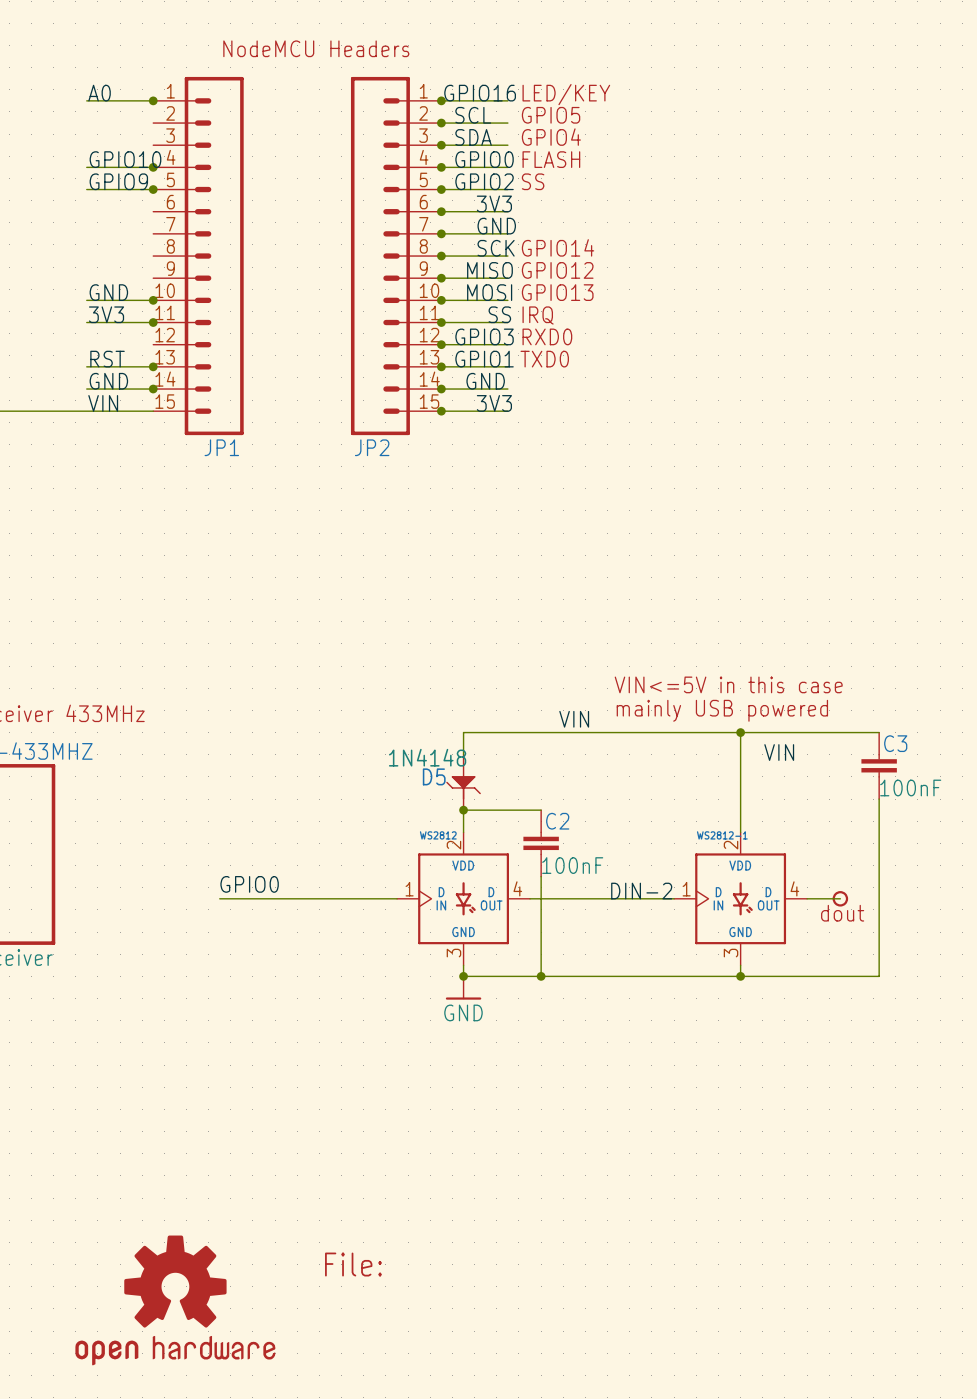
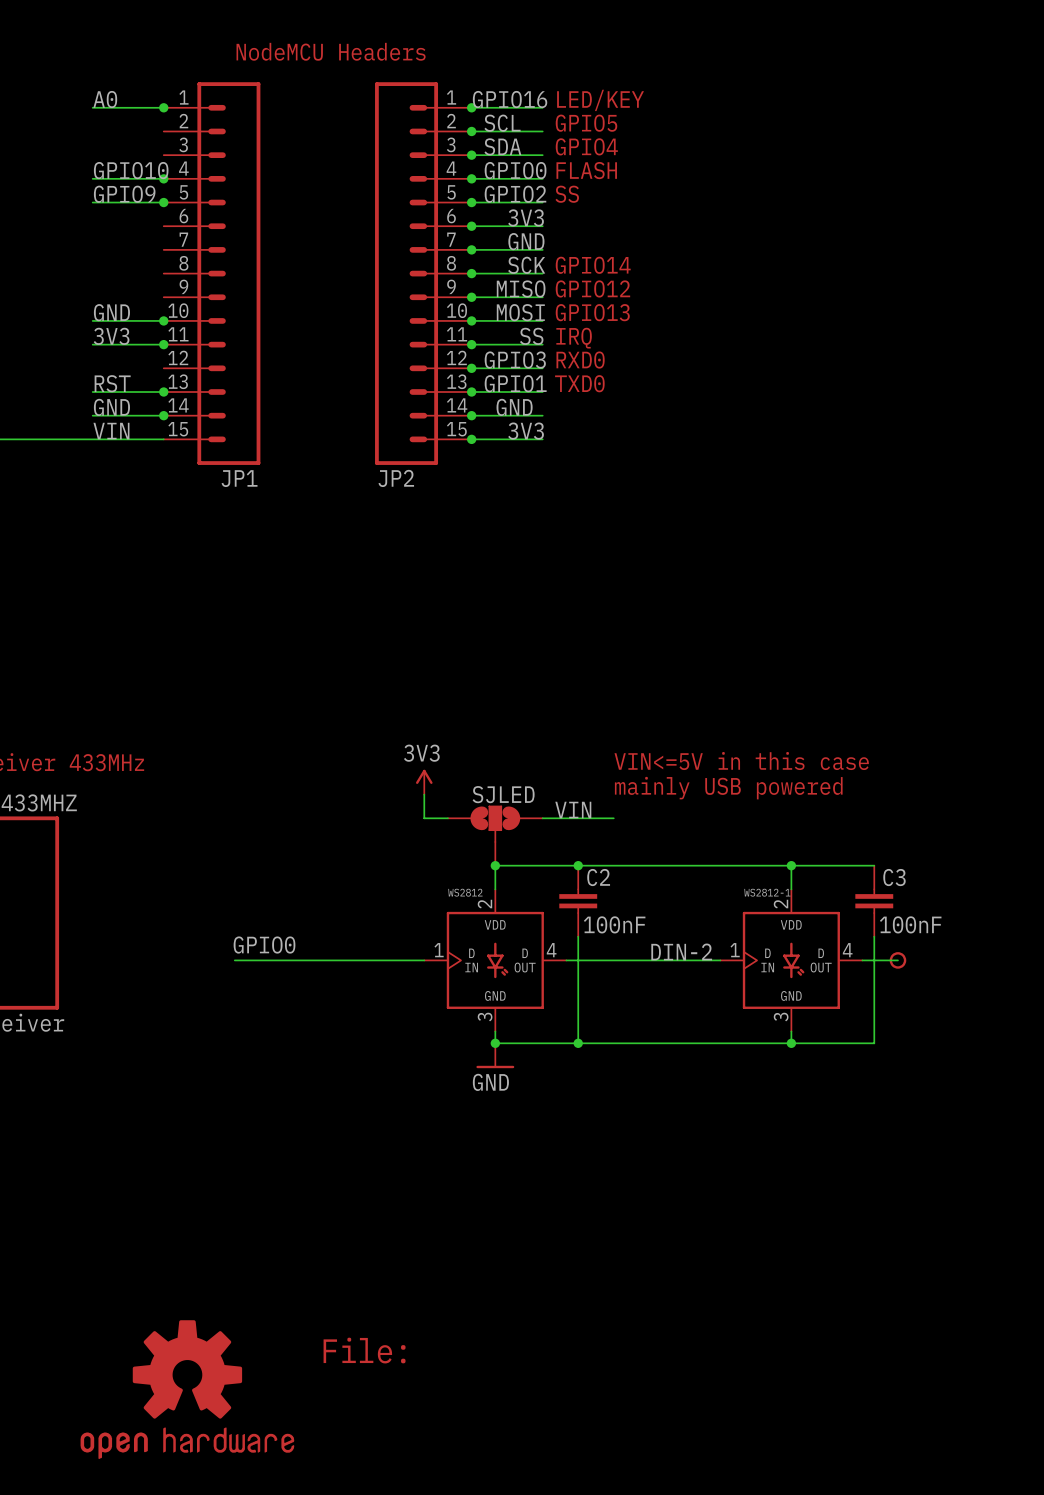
text position: VIN<=5V in this case (728, 684) -> VIN<=5V in this case (741, 761)
text position: mainly USB powered (722, 710) -> mainly USB powered (728, 788)
label position: VIN (574, 719) -> VIN (573, 810)
power symbol: none -> 3V3 (424, 782)
wire: (740, 732) (740, 810) -> none
junction: (740, 732) -> none
wire: (879, 732) (463, 732) (463, 754) -> none
wire: none -> (424, 794) (424, 818) (447, 818)
label: VIN (779, 752) -> none
wire: none -> (542, 818) (613, 818)
C3 position: (879, 765) -> (874, 901)
D5: 1N4148 (463, 782) -> none
SJLED: none -> (495, 835)
wire: (879, 799) (879, 976) (818, 976) -> (874, 936) (874, 1043)
wire: none -> (578, 865) (874, 865)
junction: none -> (578, 865)
junction: none -> (791, 865)
text: dout (842, 913) -> none

